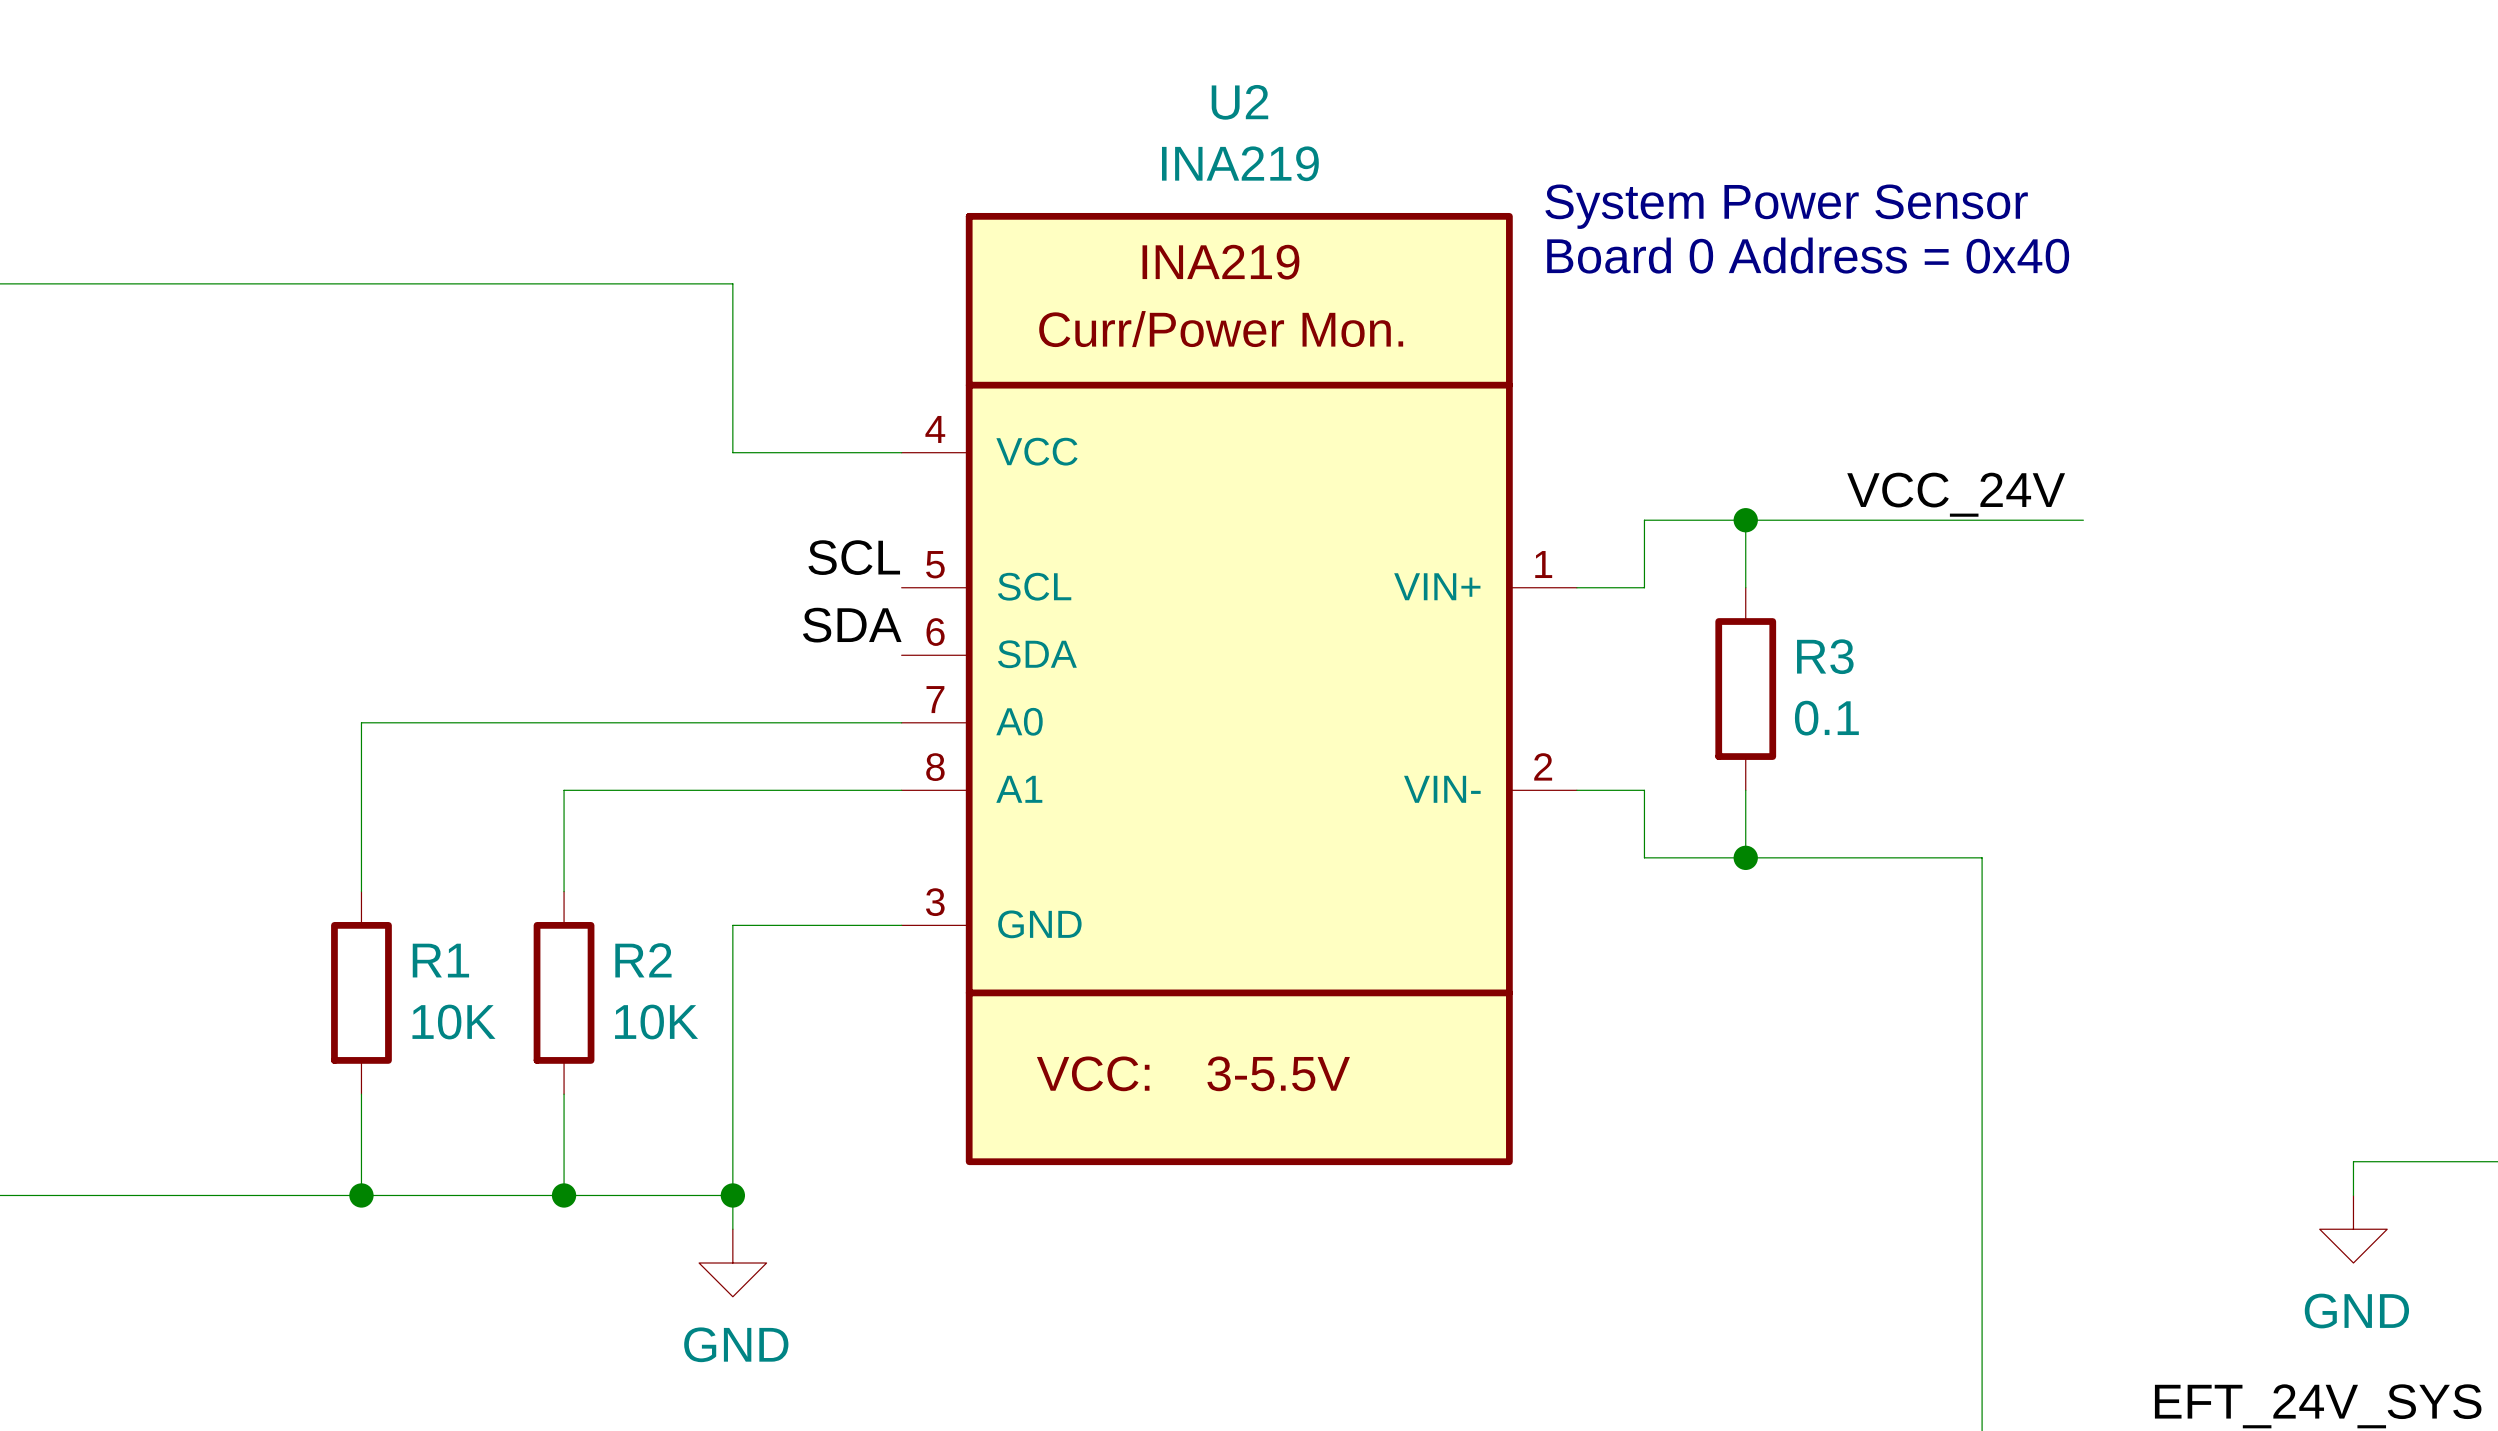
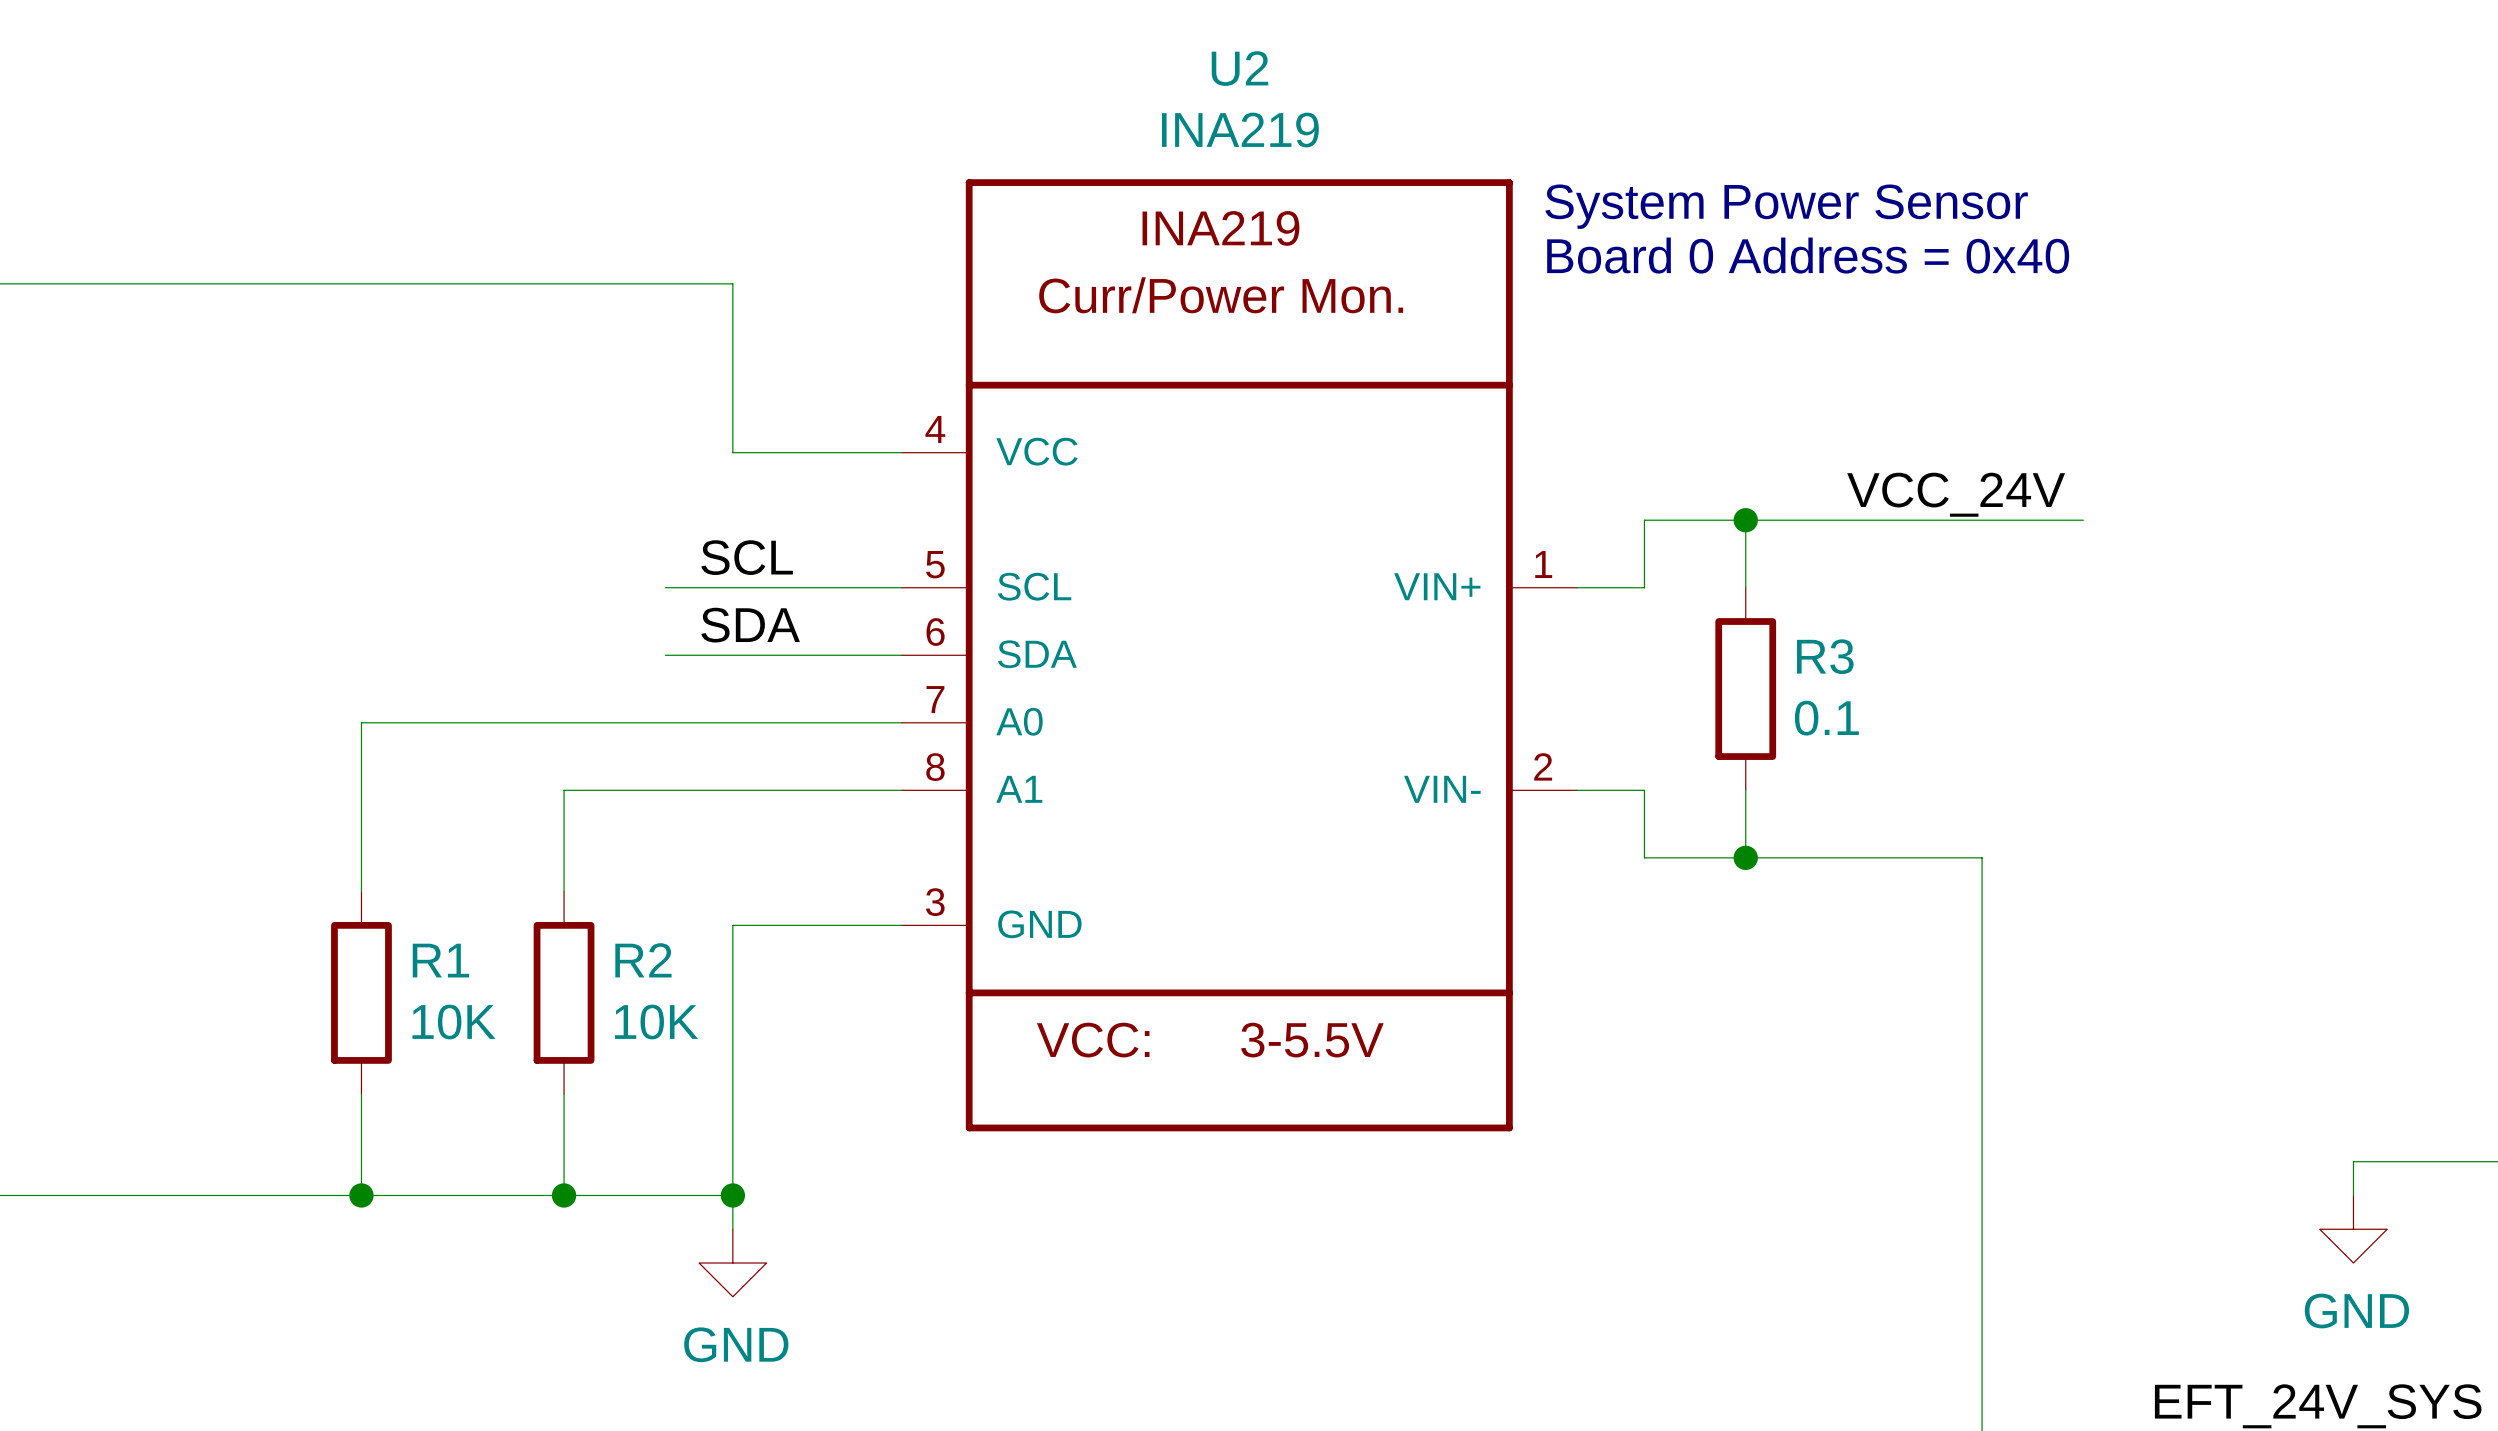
U2 symbol: [901, 212, 1577, 1166] -> [901, 179, 1577, 1132]
label position: SCL (854, 557) -> SCL (747, 557)
wire: none -> (665, 587) (901, 587)
label position: SDA (852, 625) -> SDA (750, 625)
wire: none -> (665, 655) (901, 655)

